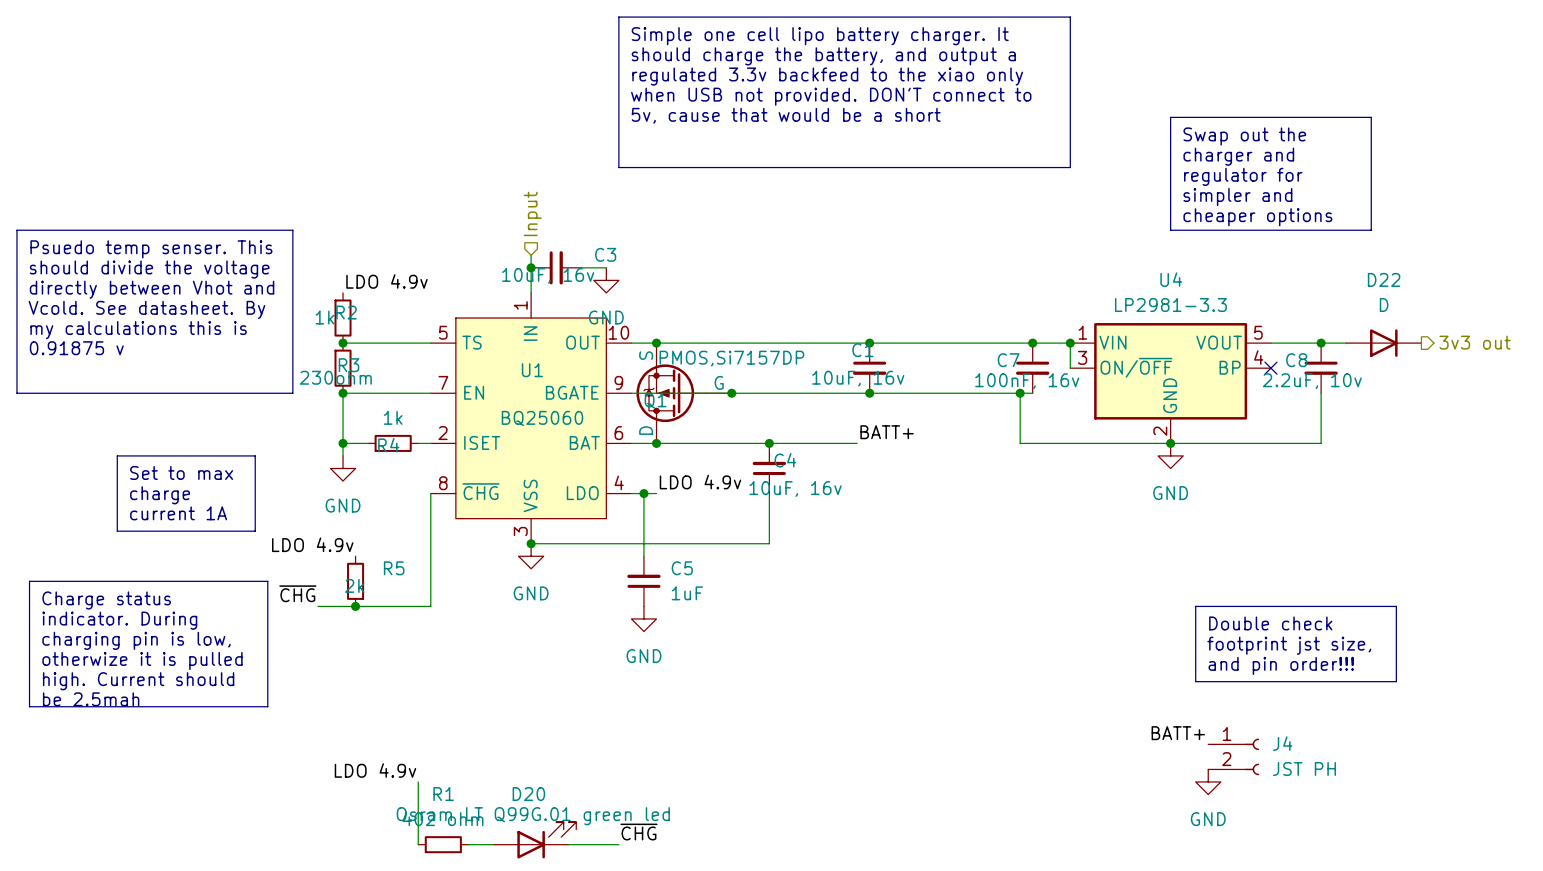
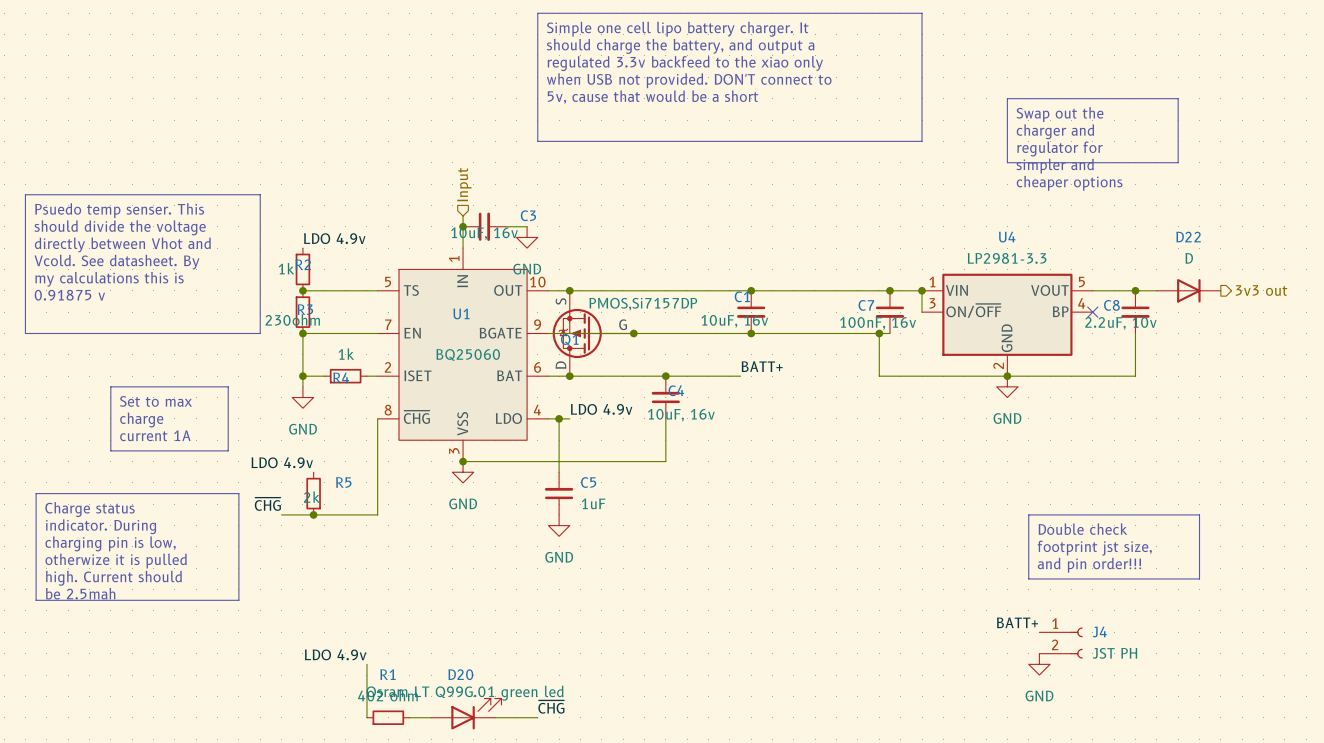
line: (1170, 192) (1170, 230) (1371, 230) (1371, 192) -> (1007, 162) (1178, 162)

